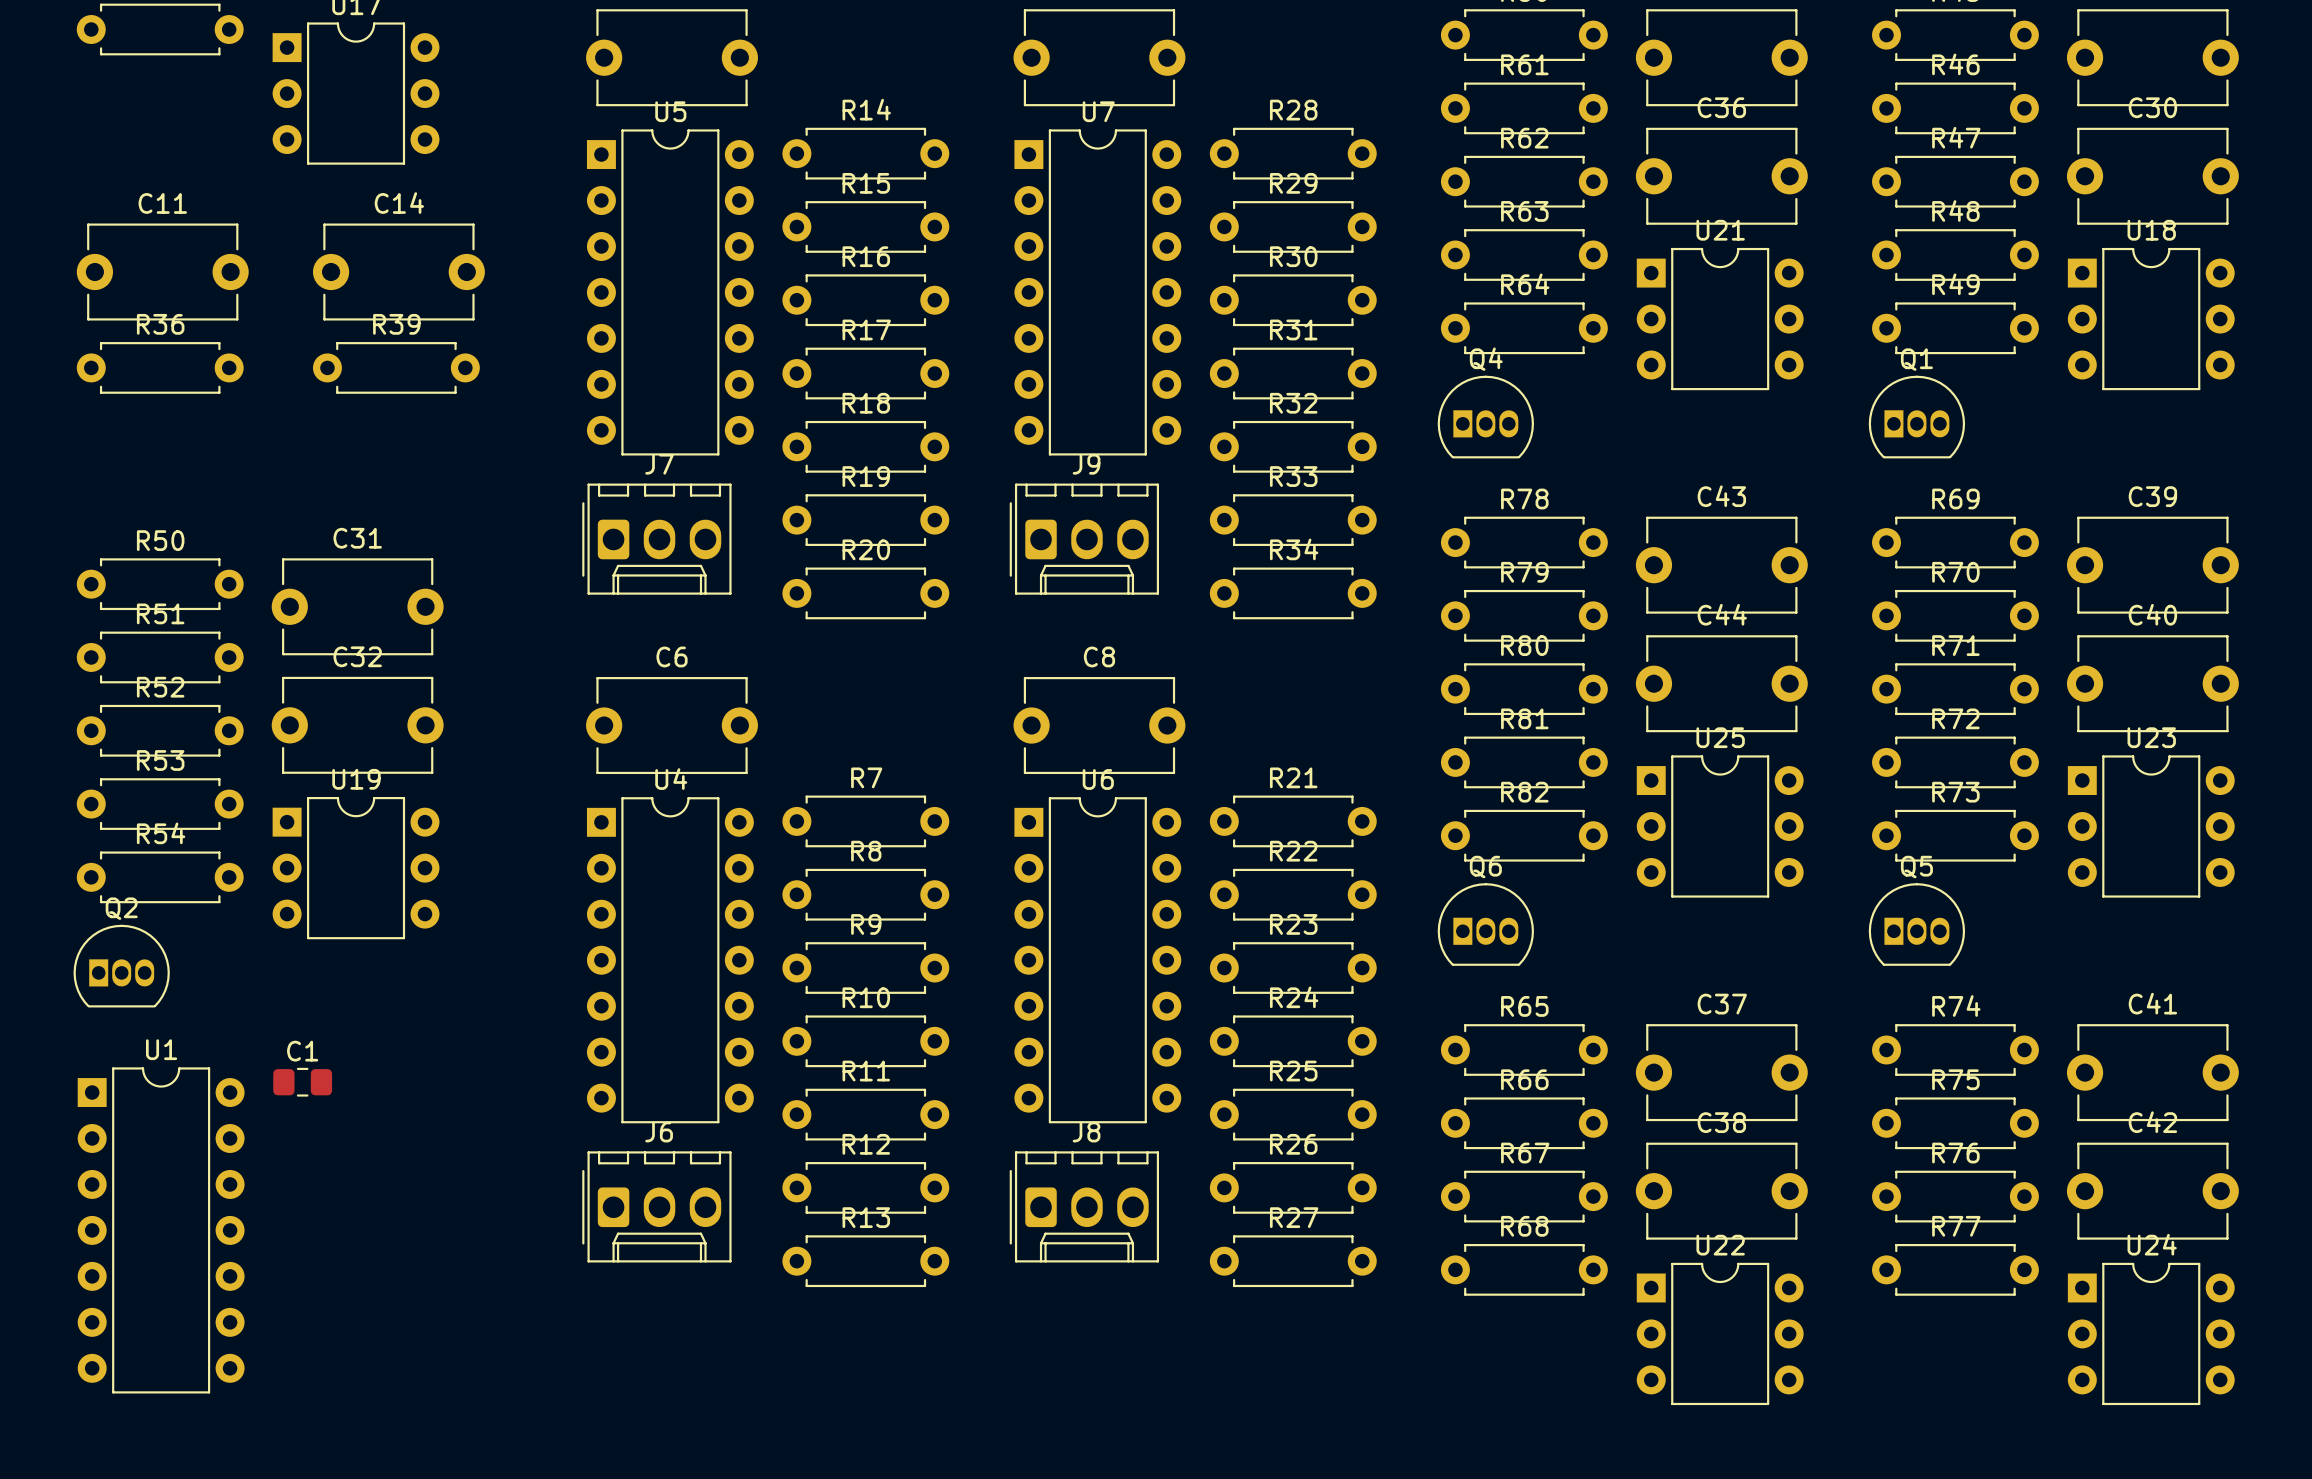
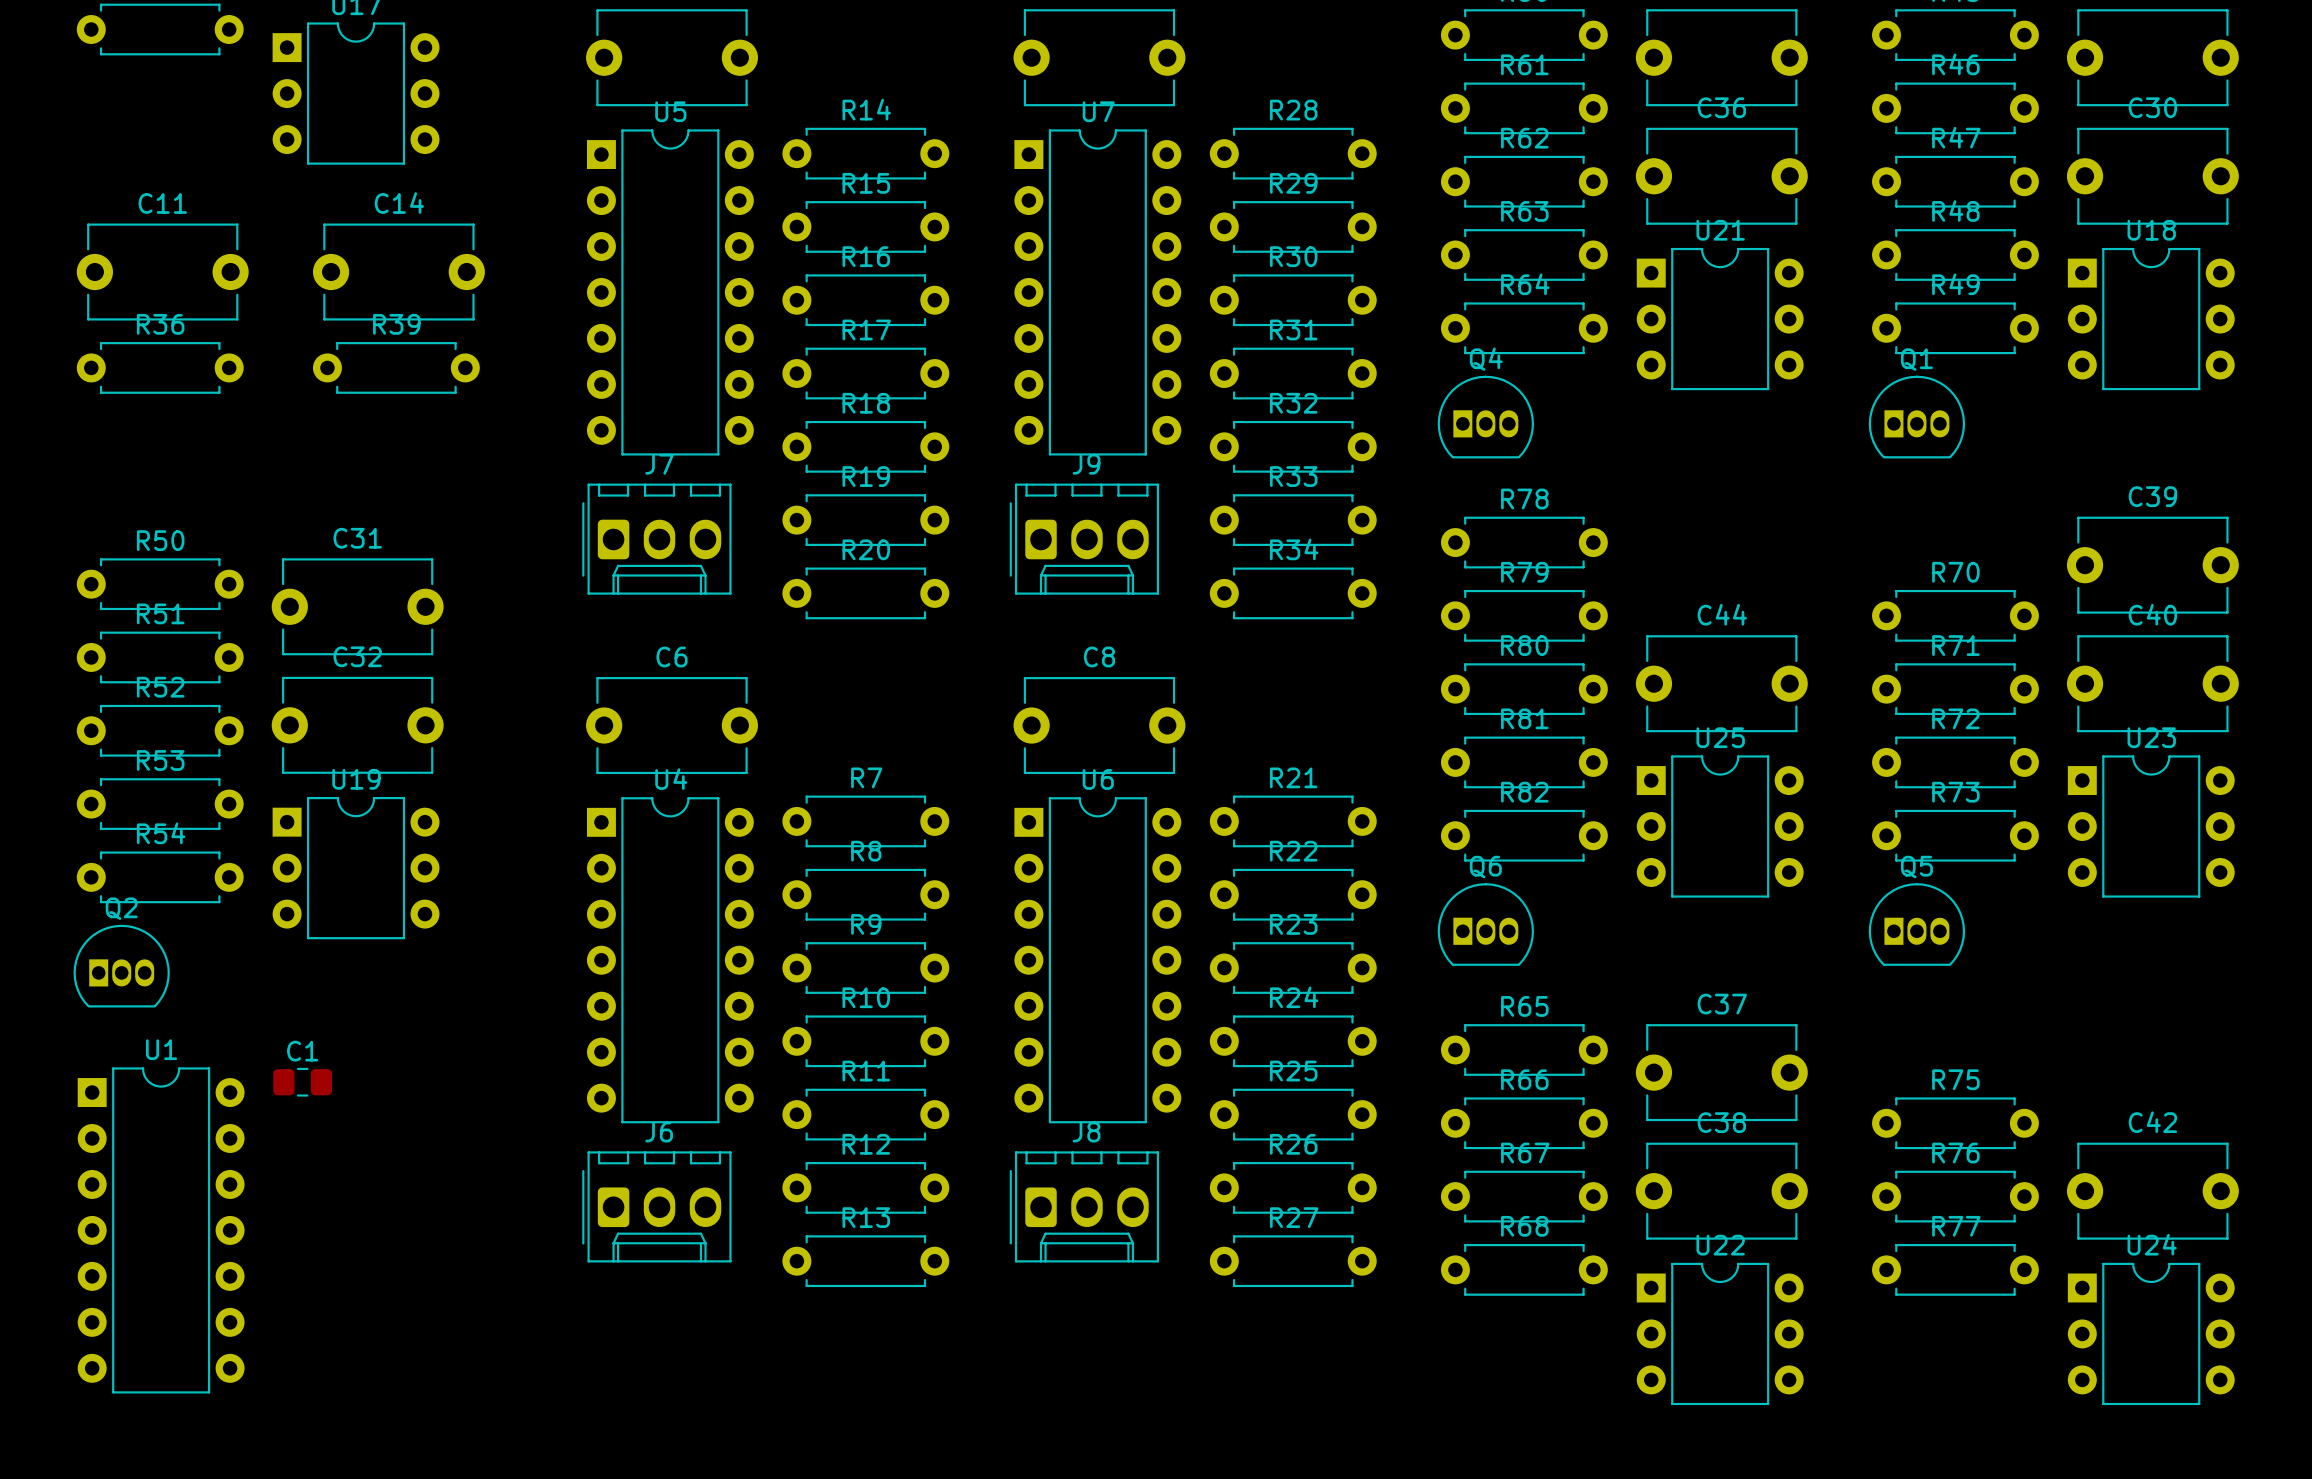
R69: (1955, 542) -> none
C43: (1721, 565) -> none
R74: (1955, 1050) -> none
C41: (2152, 1072) -> none

